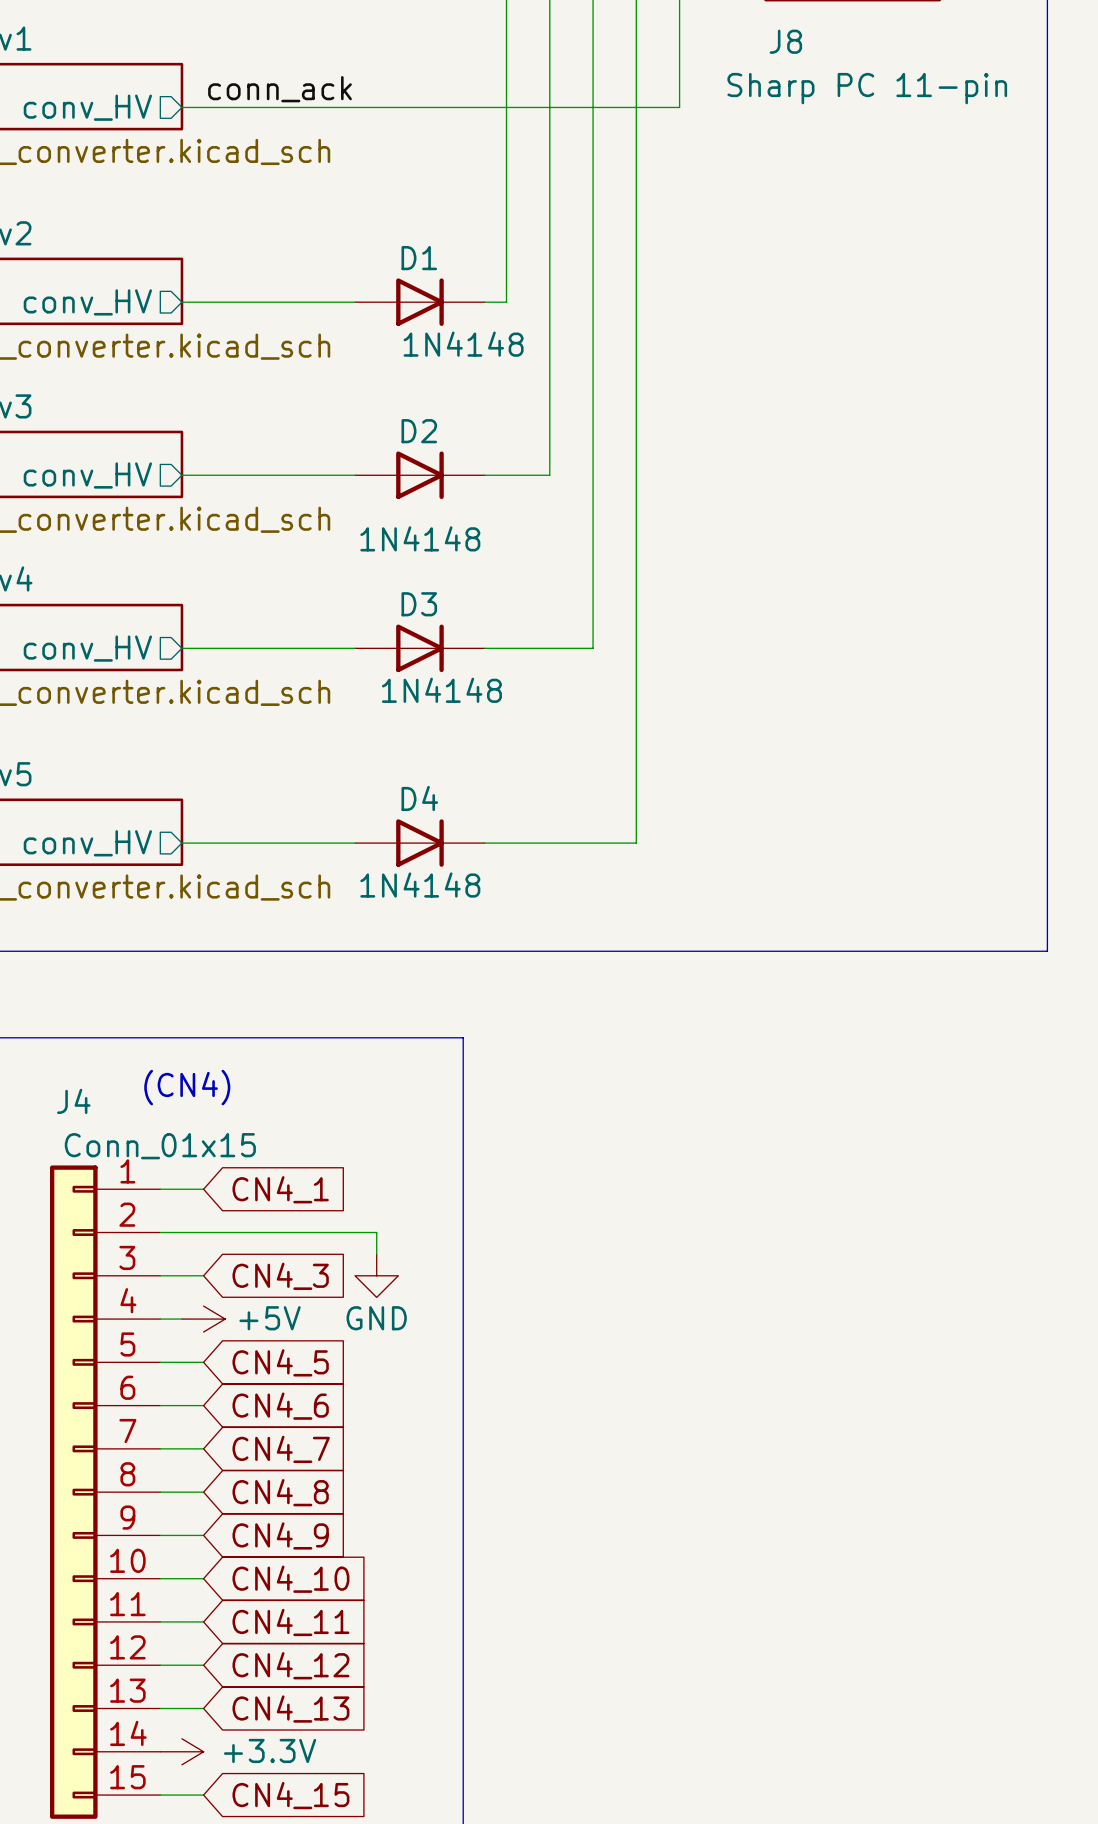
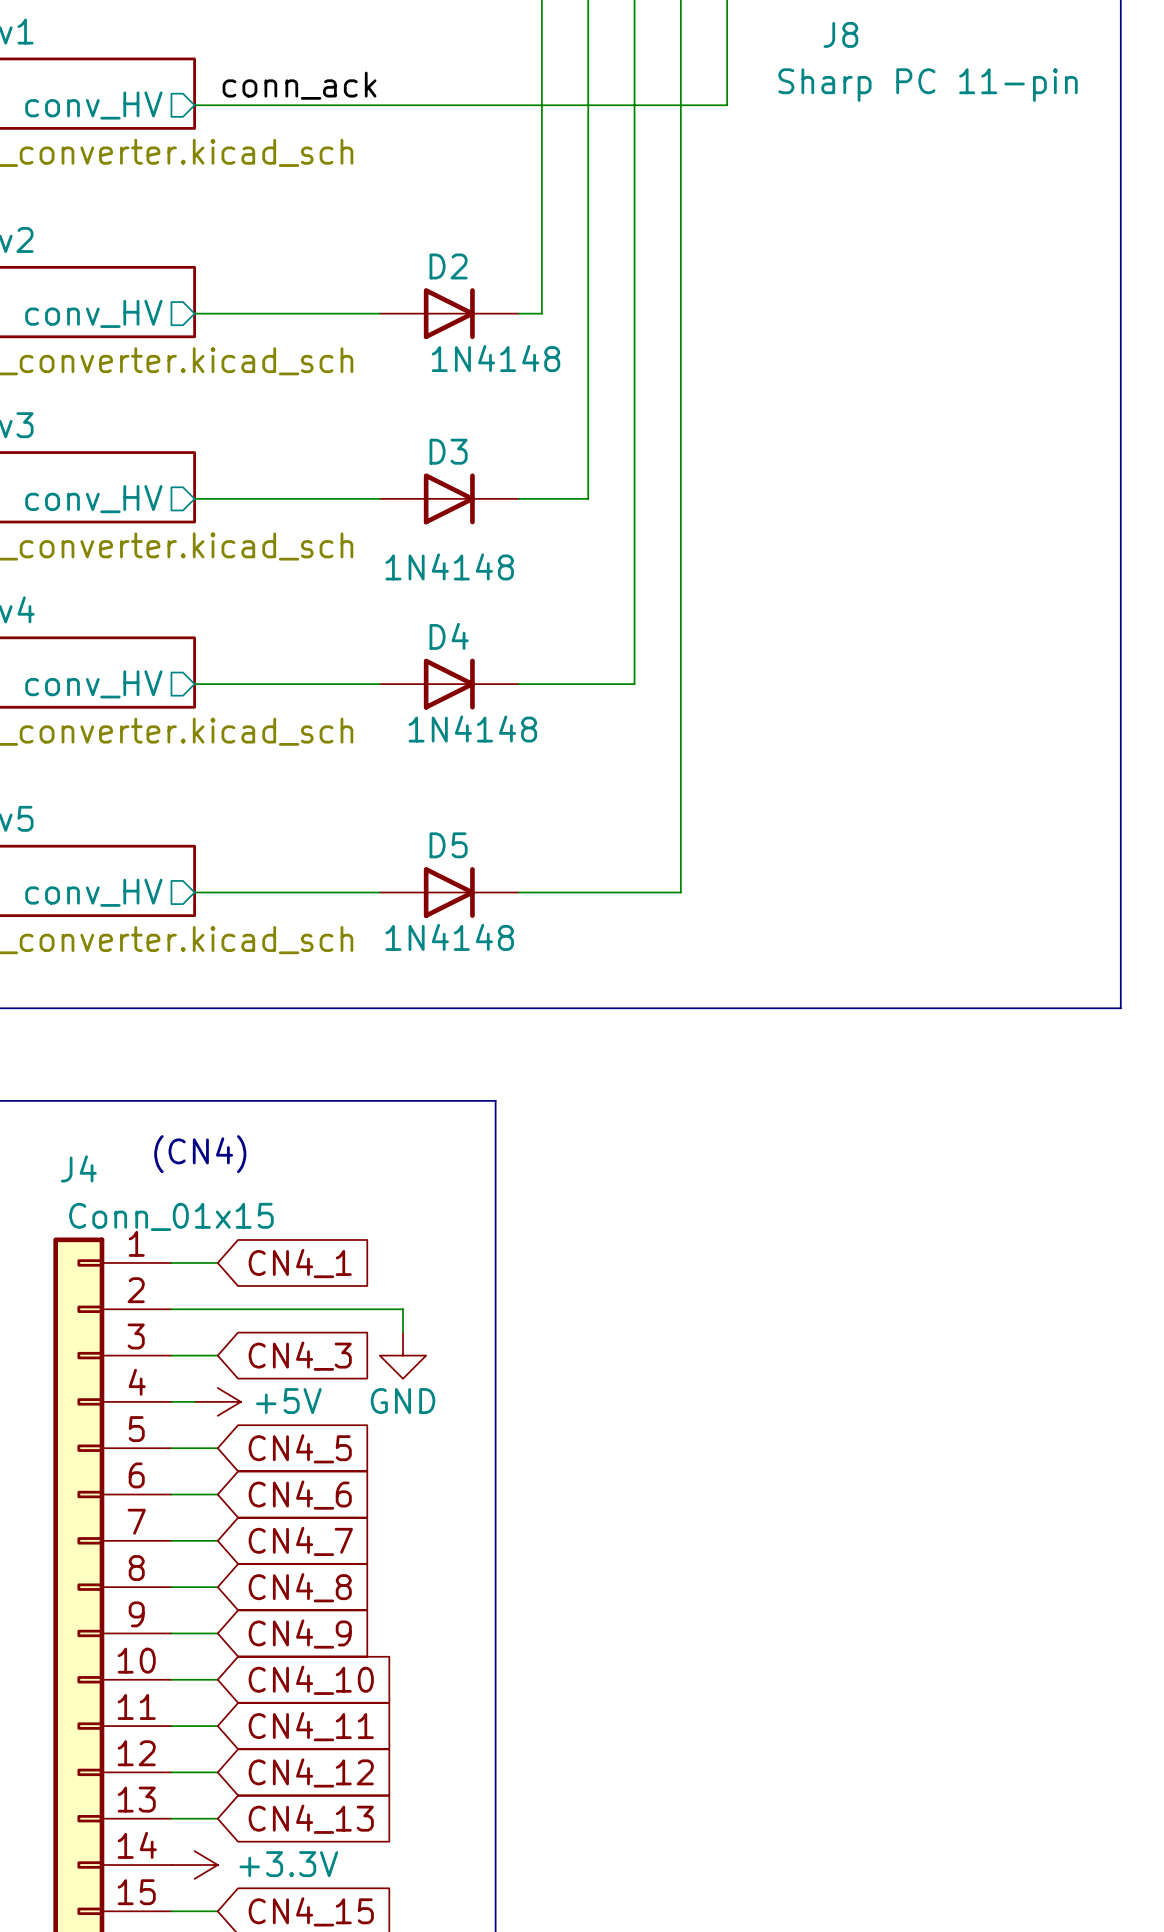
D1 name: D1 (419, 258) -> D2 (448, 266)
D2 name: D2 (419, 431) -> D3 (448, 451)
D3 name: D3 (419, 604) -> D4 (449, 636)
D4 name: D4 (419, 798) -> D5 (448, 845)

